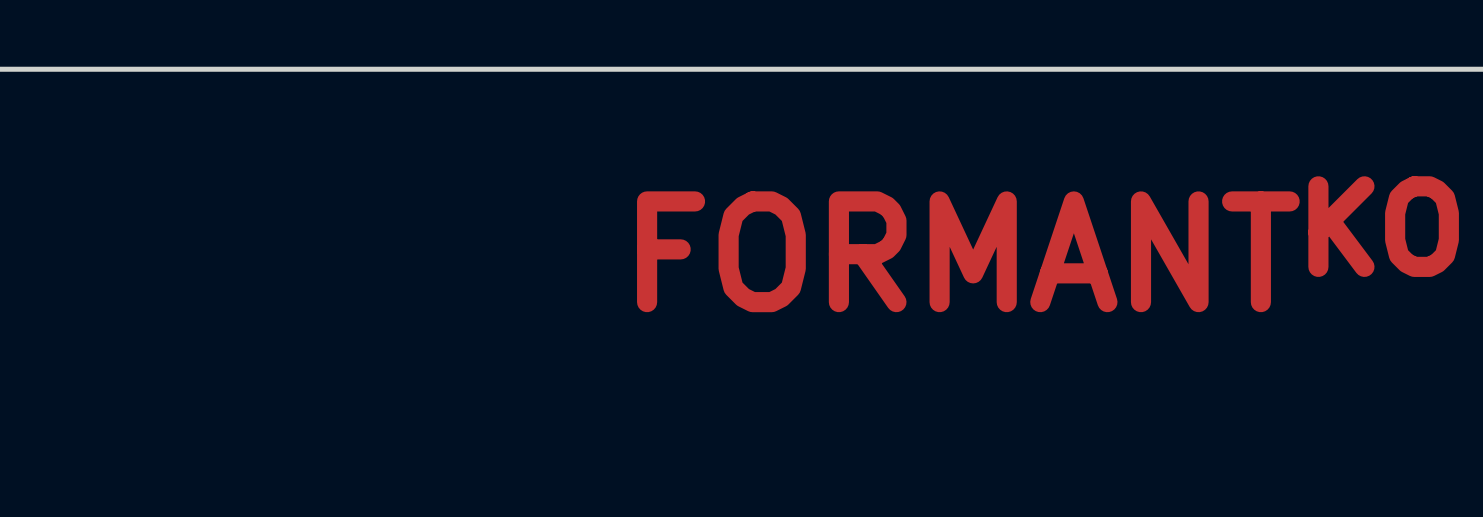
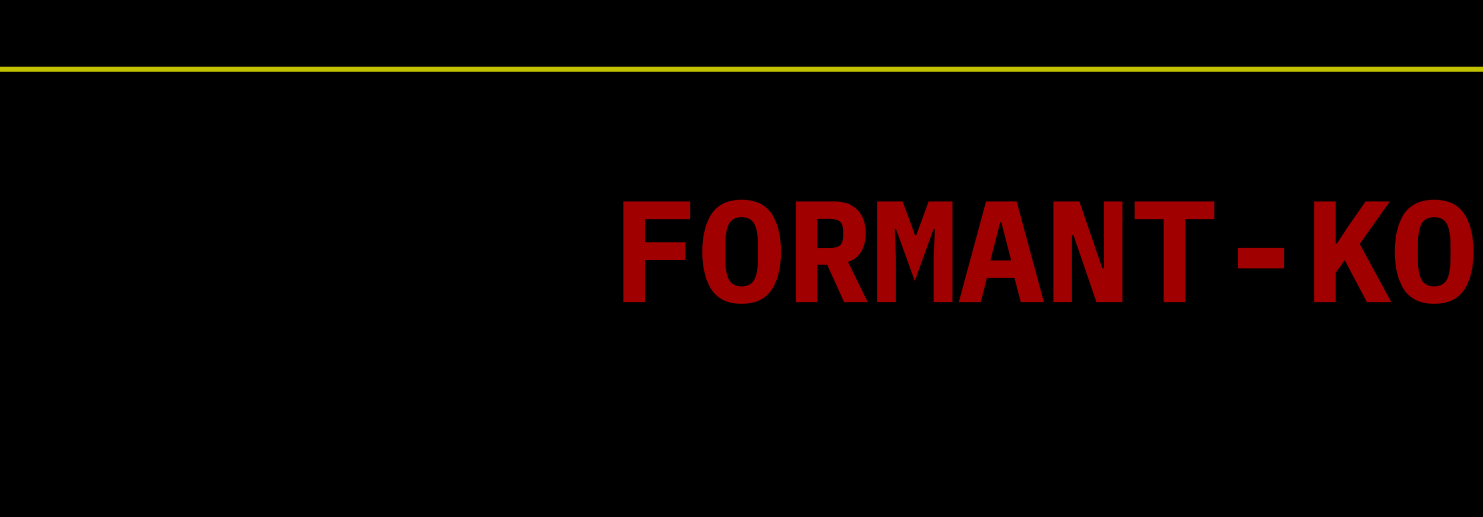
text: FORMANTKO (1047, 244) -> FORMANT-KO (1048, 251)

